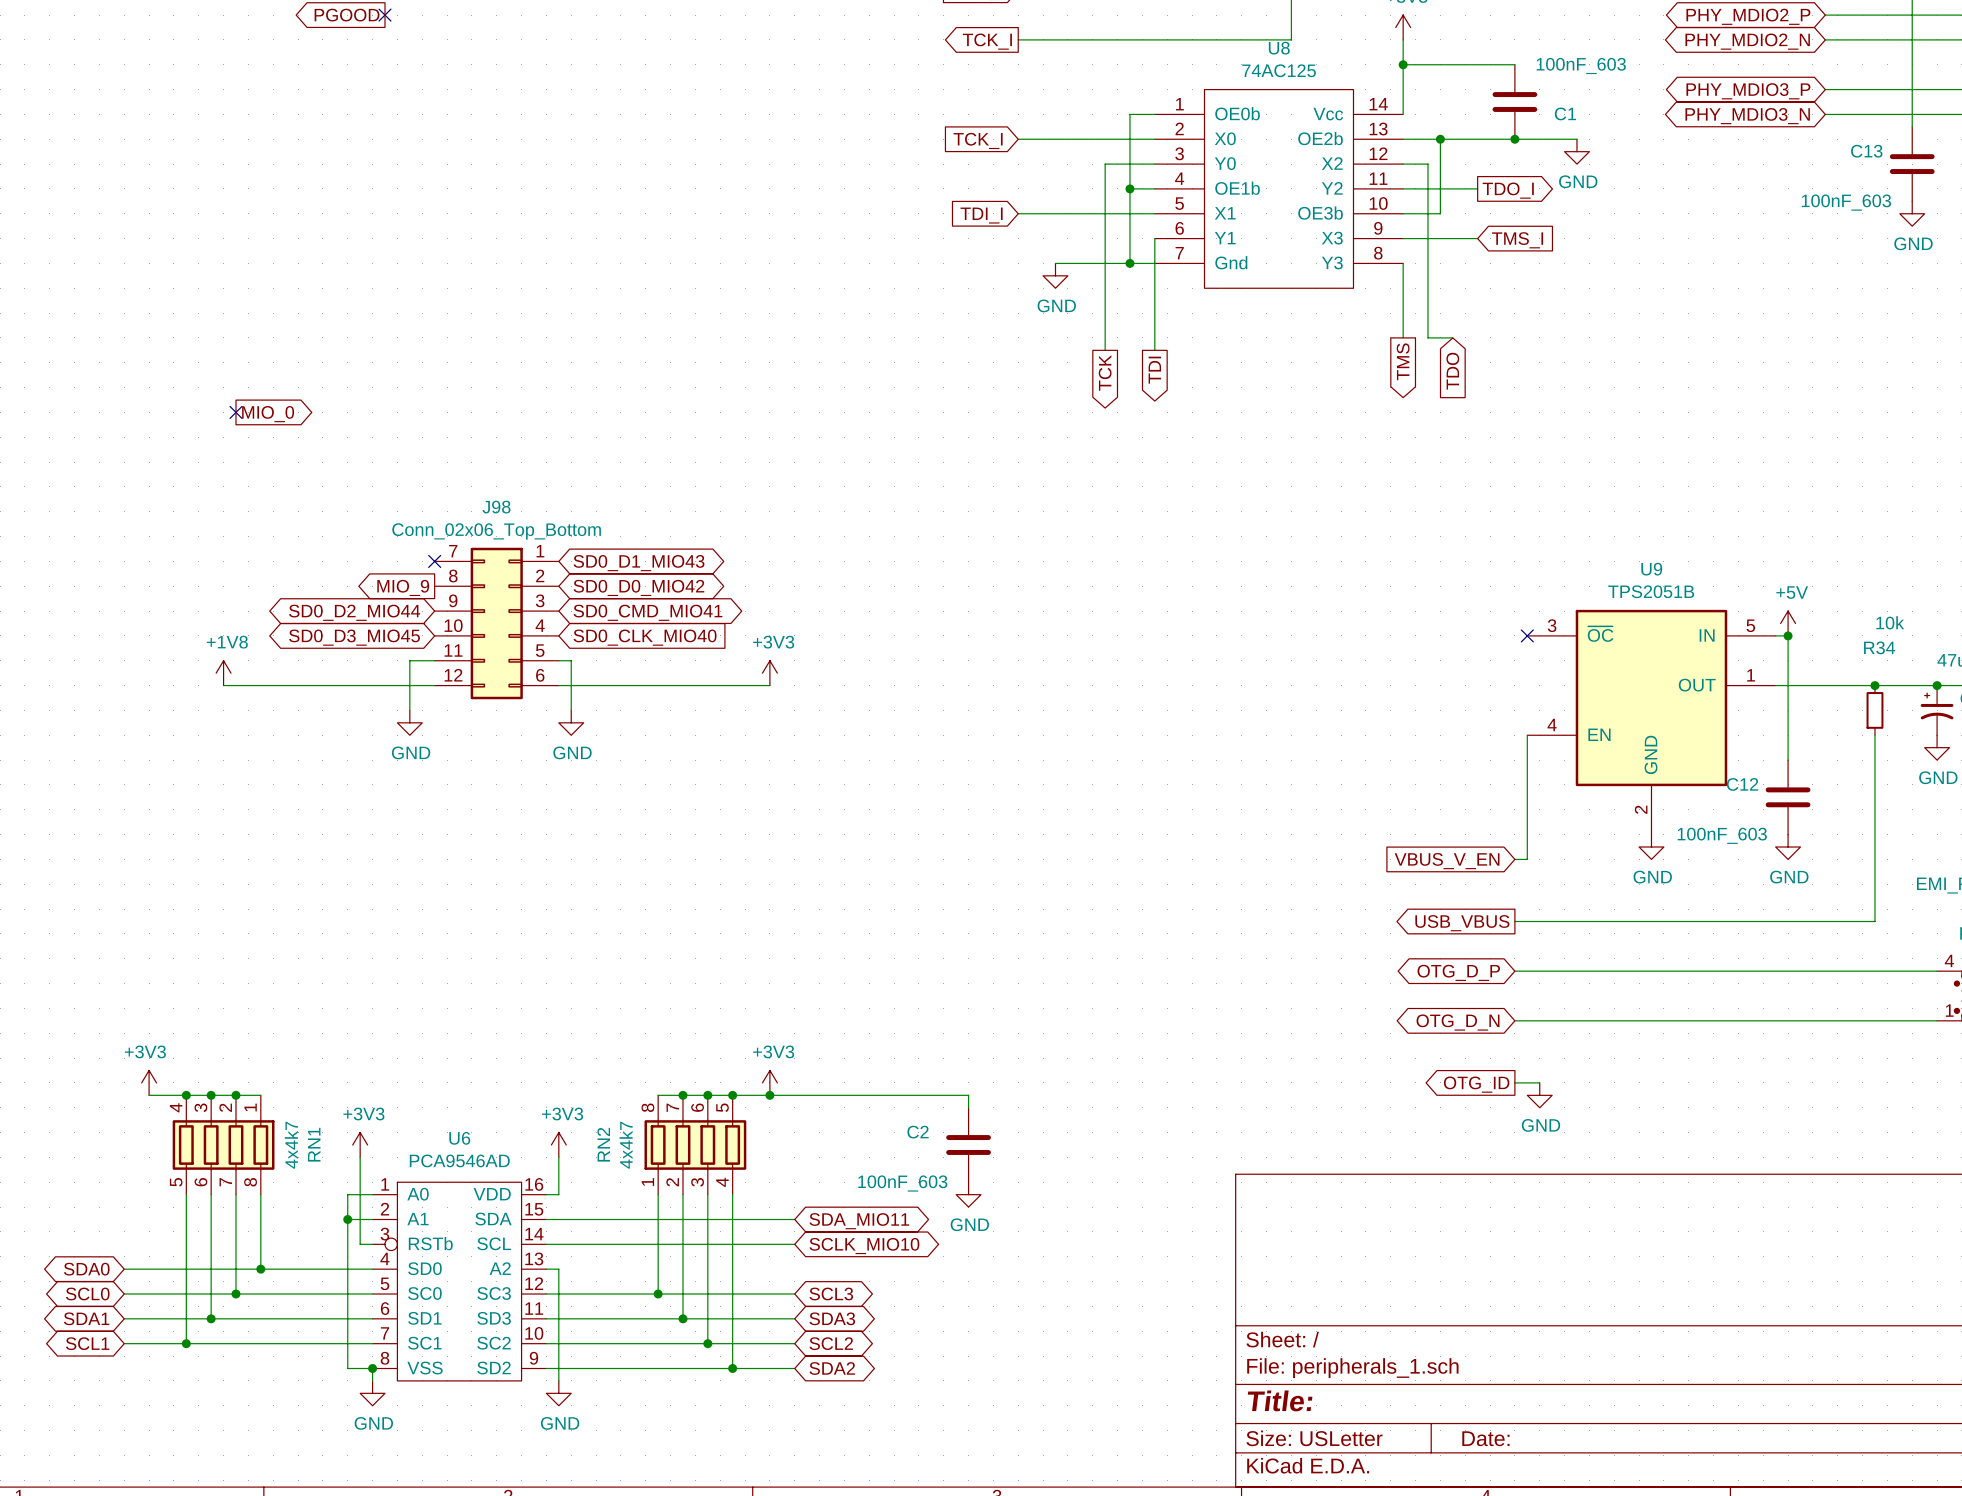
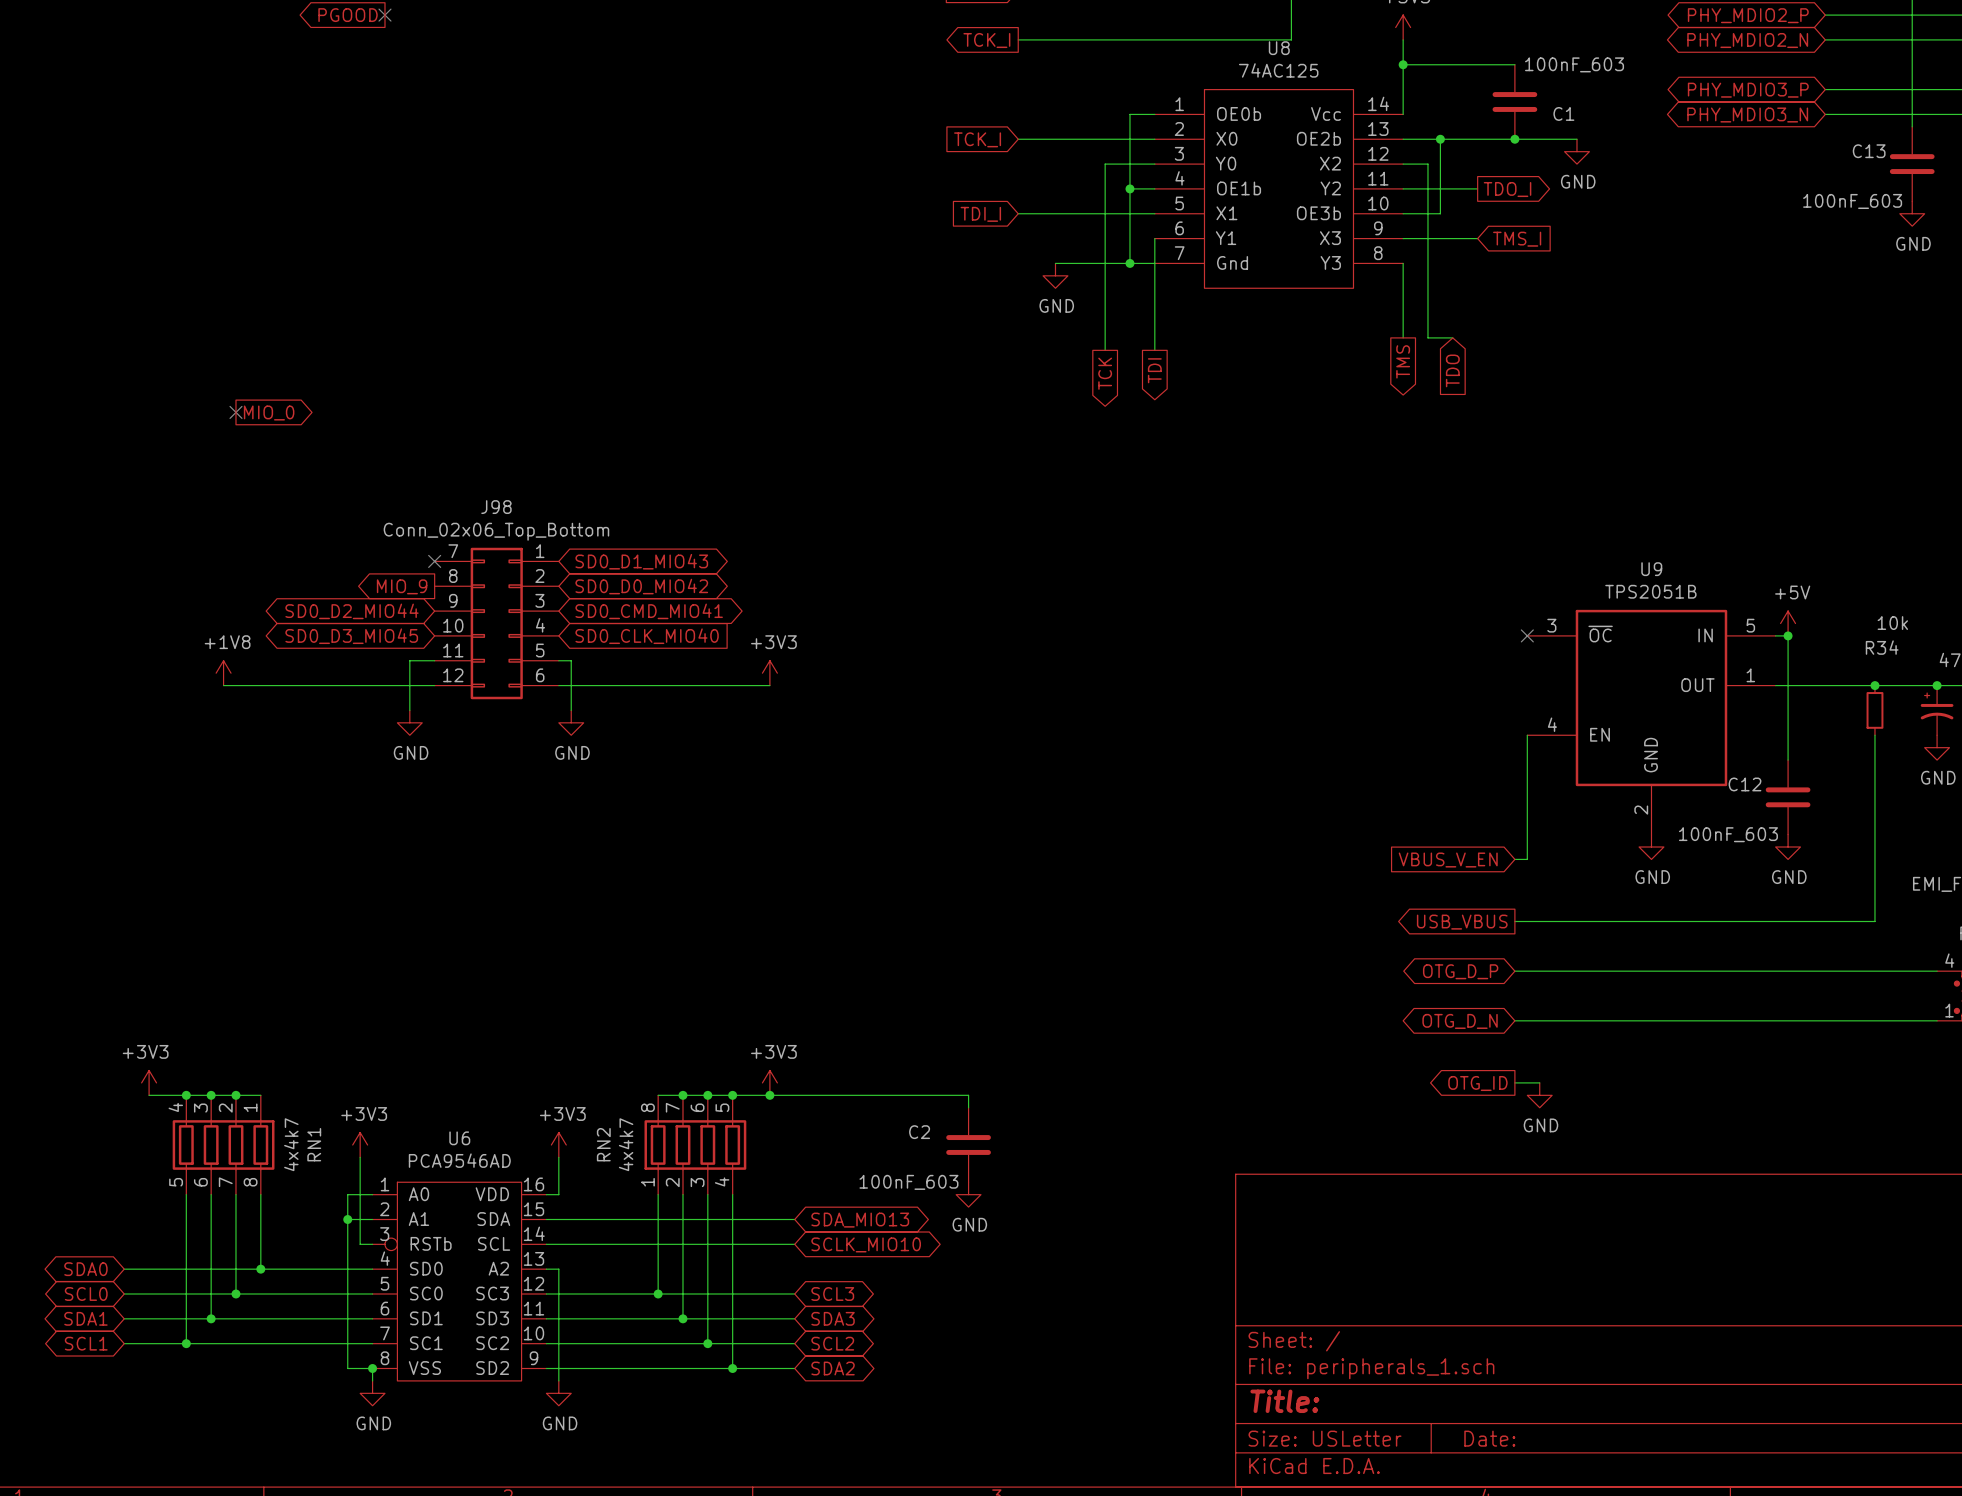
global label: SDA_MIO11 (859, 1221) -> SDA_MIO13 (860, 1220)

